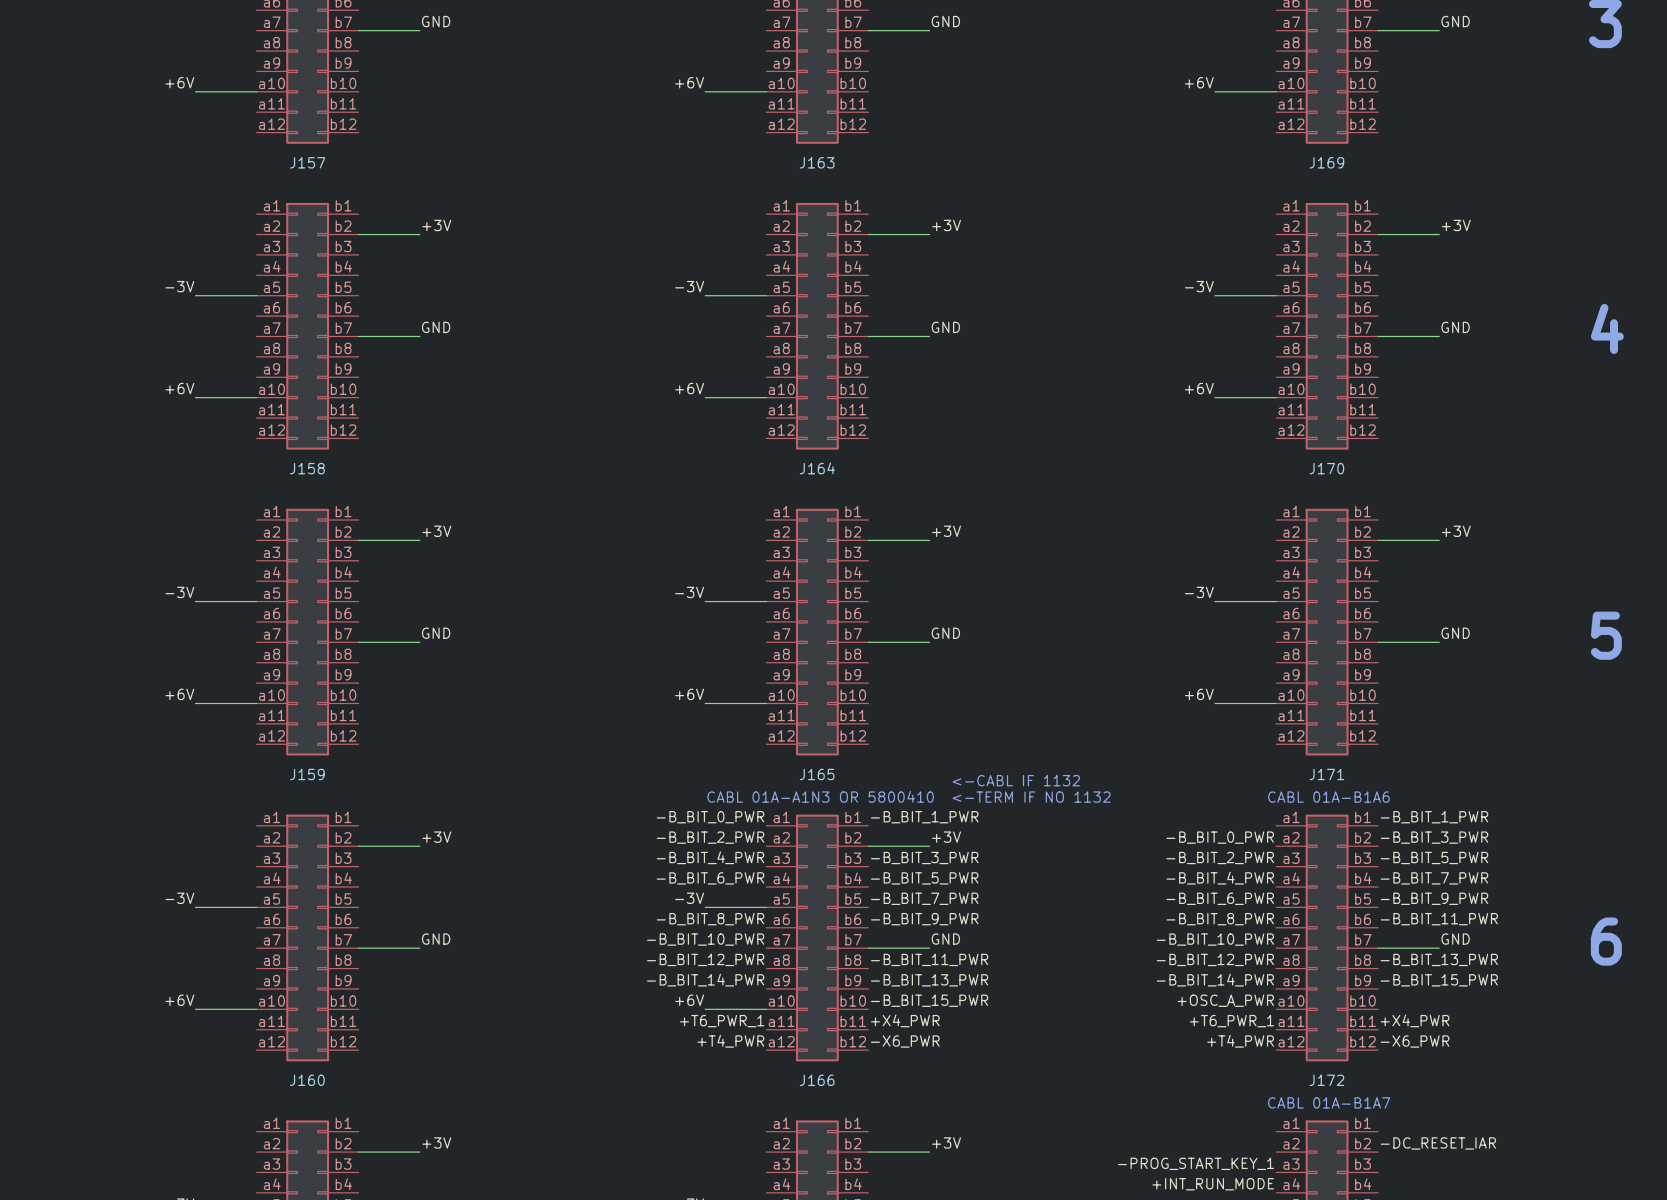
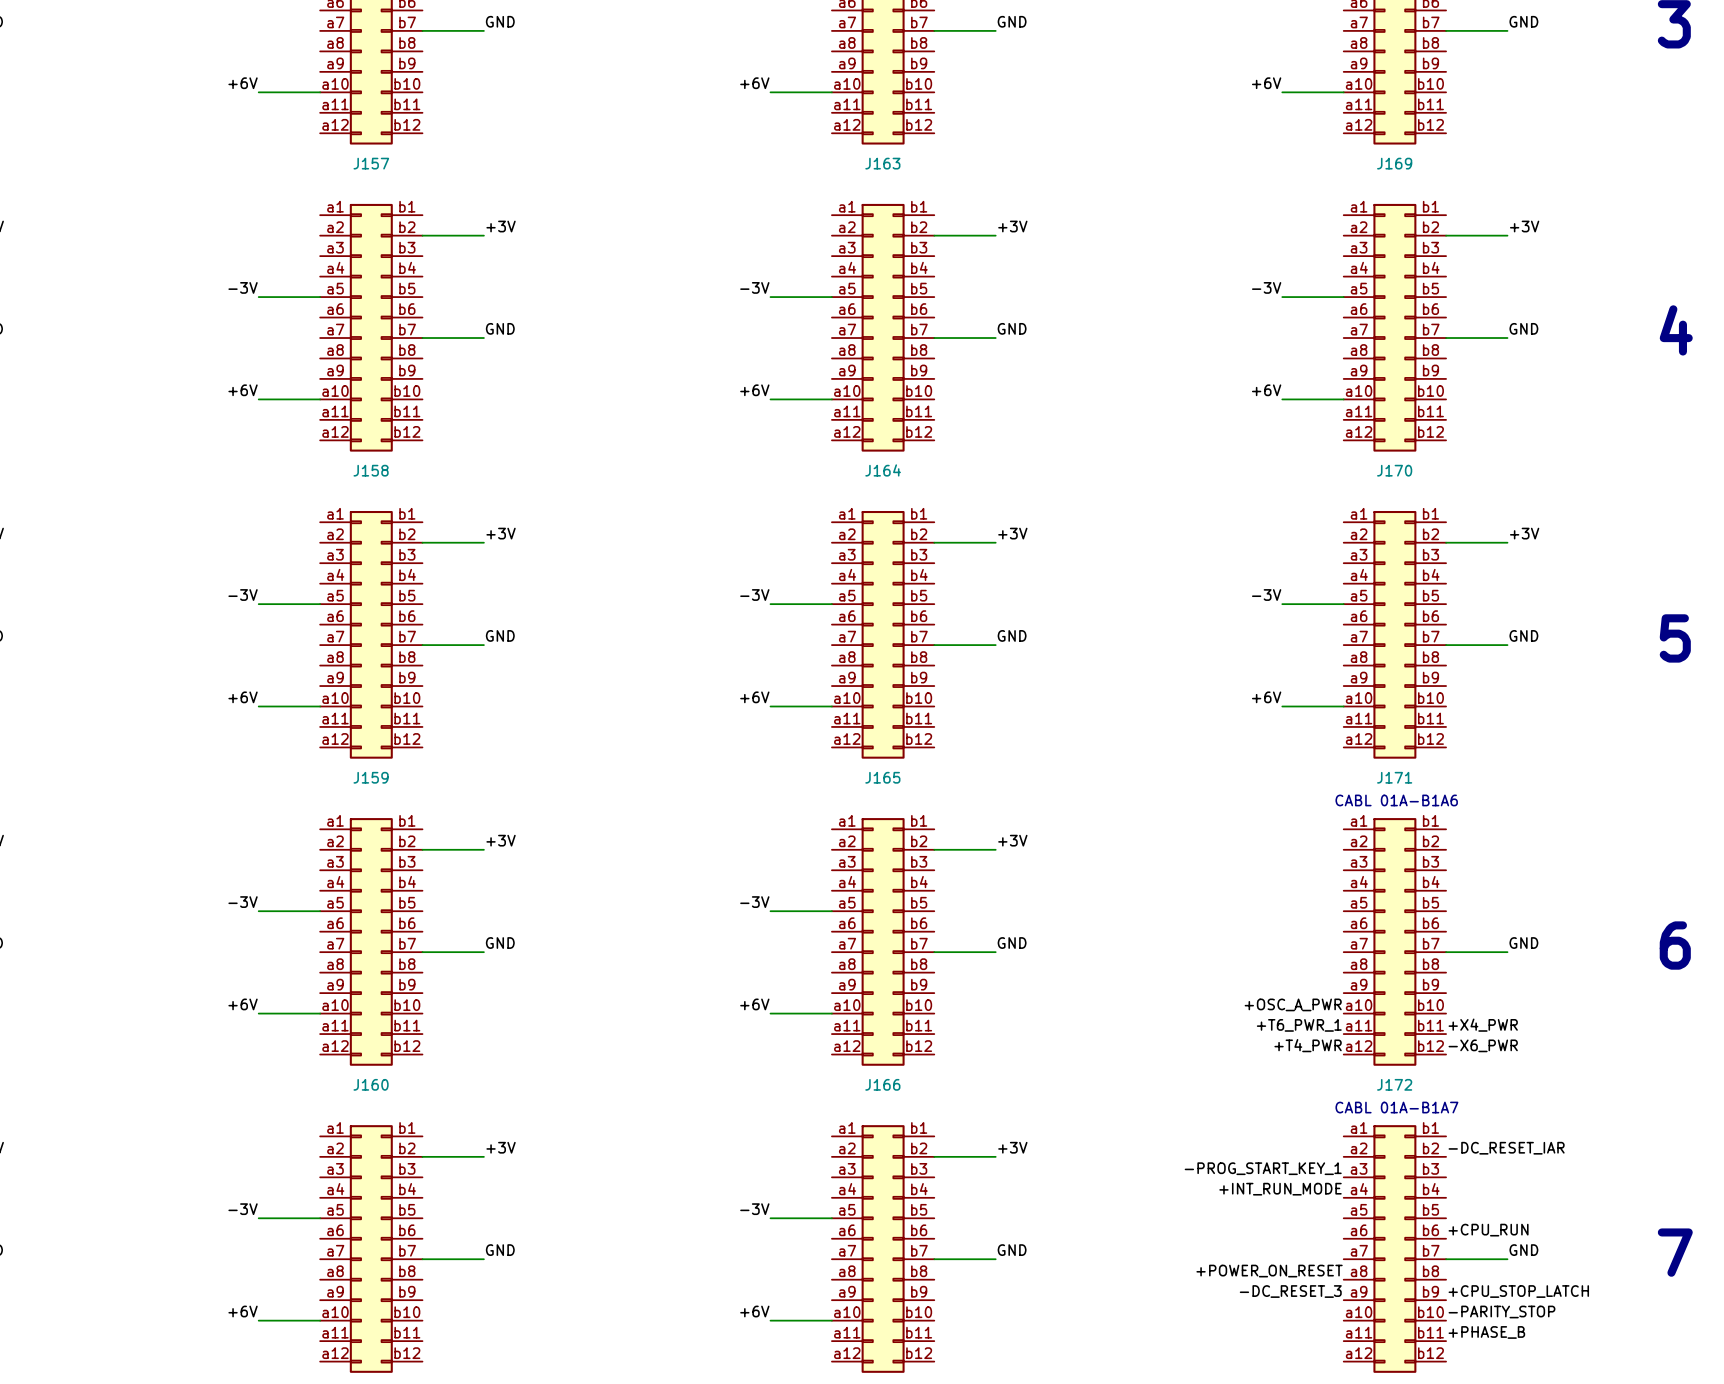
text: <-CABL IF 1132 (1016, 780) -> none
text: CABL 01A-A1N3 OR 5800410 (820, 796) -> none
text: <-TERM IF NO 1132 (1031, 797) -> none
label: -B_BIT_0_PWR (710, 817) -> none
label: -B_BIT_1_PWR (924, 817) -> none
label: -B_BIT_1_PWR (1434, 817) -> none
label: -B_BIT_2_PWR (710, 837) -> none
label: -B_BIT_0_PWR (1220, 837) -> none
label: -B_BIT_3_PWR (1434, 837) -> none
label: -B_BIT_4_PWR (710, 857) -> none
label: -B_BIT_3_PWR (924, 857) -> none
label: -B_BIT_2_PWR (1220, 857) -> none
label: -B_BIT_5_PWR (1434, 857) -> none
label: -B_BIT_6_PWR (710, 878) -> none
label: -B_BIT_5_PWR (924, 878) -> none
label: -B_BIT_4_PWR (1220, 878) -> none
label: -B_BIT_7_PWR (1434, 878) -> none
label: -B_BIT_7_PWR (924, 898) -> none
label: -B_BIT_6_PWR (1220, 898) -> none
label: -B_BIT_9_PWR (1434, 898) -> none
label: -B_BIT_8_PWR (710, 919) -> none
label: -B_BIT_9_PWR (924, 919) -> none
label: -B_BIT_8_PWR (1220, 919) -> none
label: -B_BIT_11_PWR (1439, 919) -> none
label: -B_BIT_10_PWR (705, 939) -> none
label: -B_BIT_10_PWR (1215, 939) -> none
label: -B_BIT_12_PWR (705, 959) -> none
label: -B_BIT_11_PWR (929, 959) -> none
label: -B_BIT_12_PWR (1215, 959) -> none
label: -B_BIT_13_PWR (1439, 959) -> none
label: -B_BIT_14_PWR (705, 980) -> none
label: -B_BIT_13_PWR (929, 980) -> none
label: -B_BIT_14_PWR (1215, 980) -> none
label: -B_BIT_15_PWR (1439, 980) -> none
label: -B_BIT_15_PWR (929, 1000) -> none
label: +X4_PWR (905, 1020) -> none
label: +T6_PWR_1 (722, 1021) -> none
label: +T4_PWR (730, 1041) -> none
label: -X6_PWR (905, 1041) -> none

